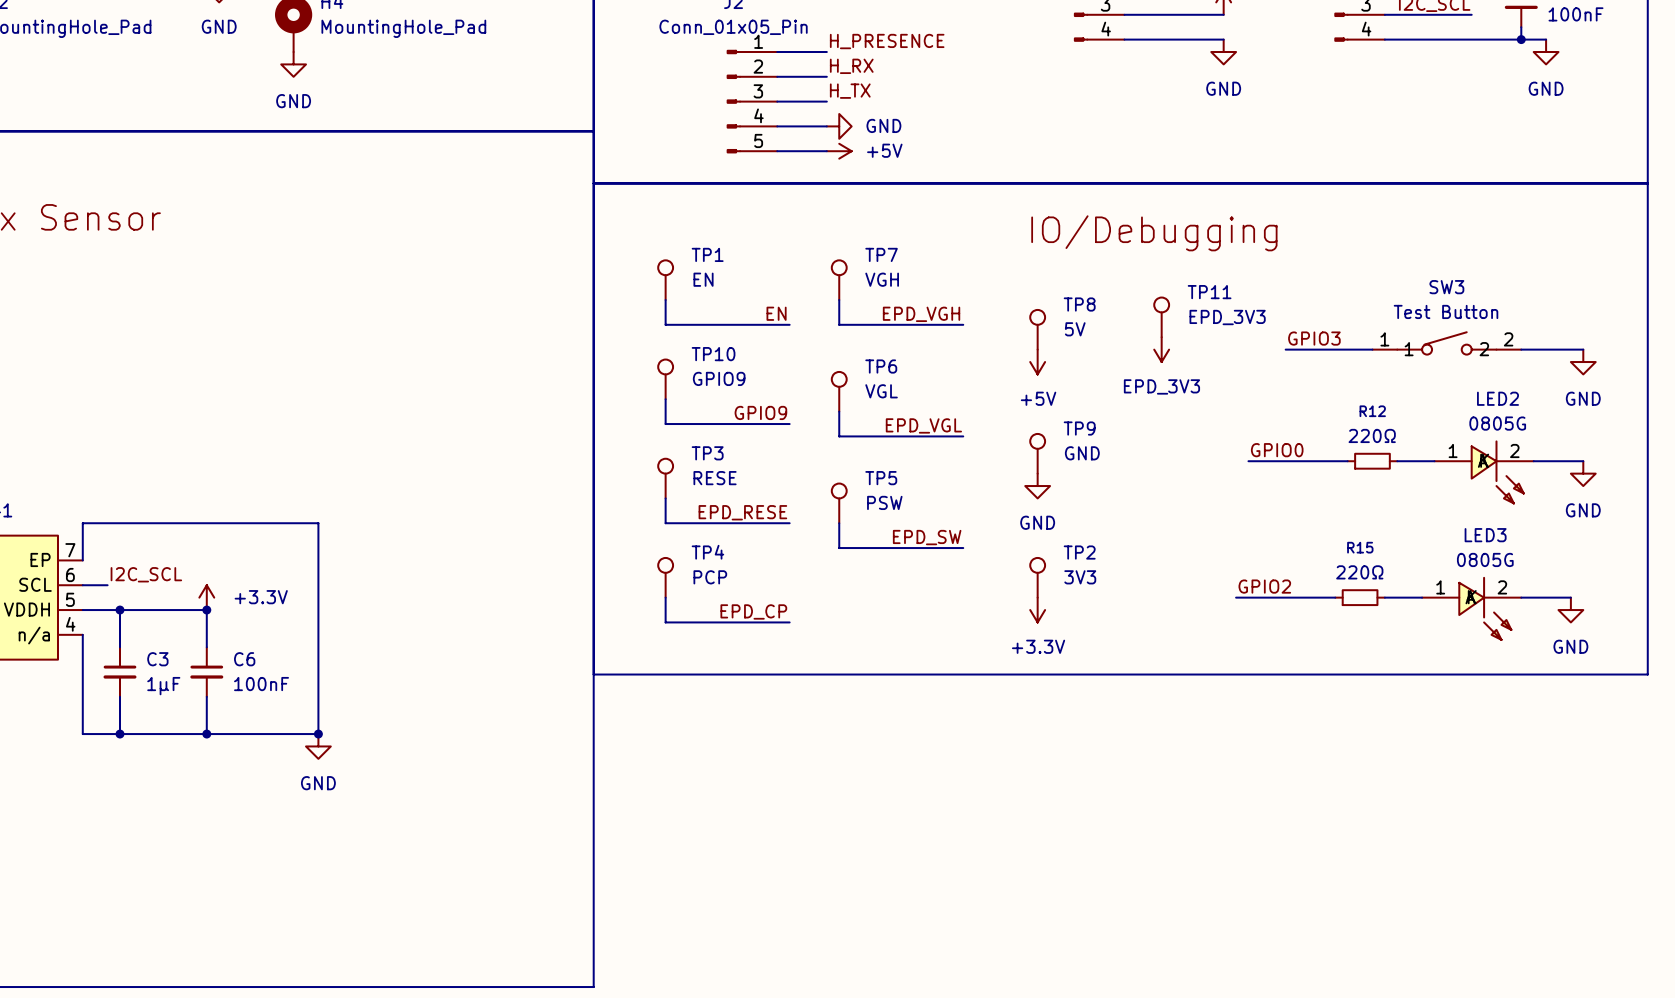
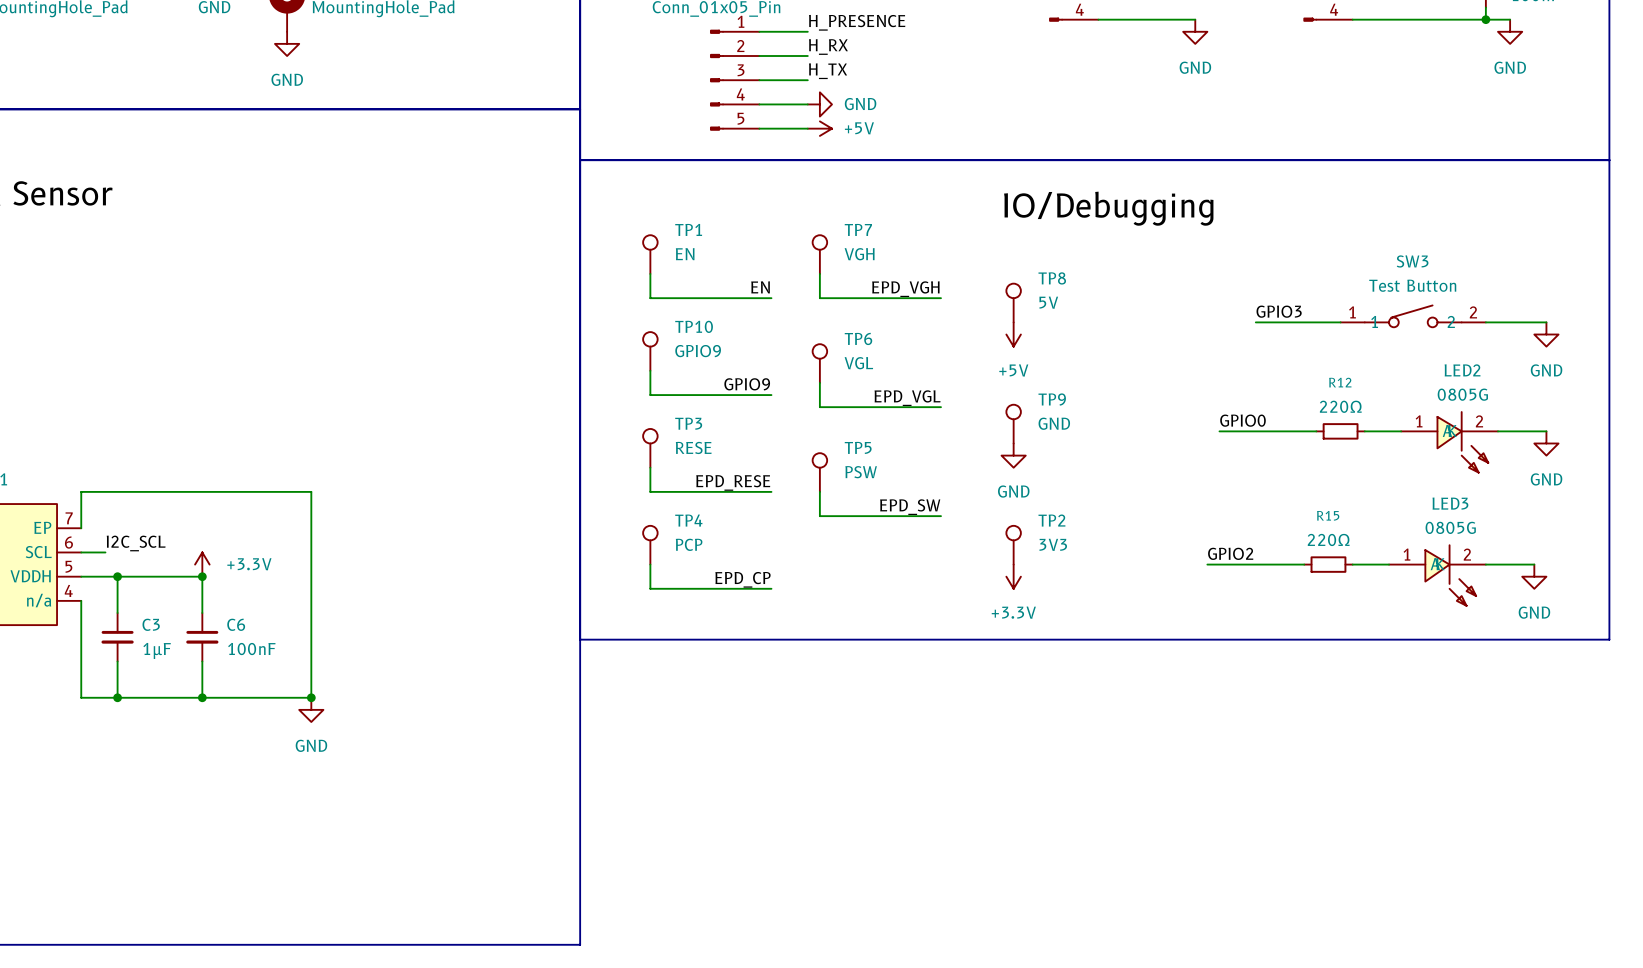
TP11: EPD_3V3 (1161, 317) -> none
power symbol: EPD_3V3 (1161, 349) -> none

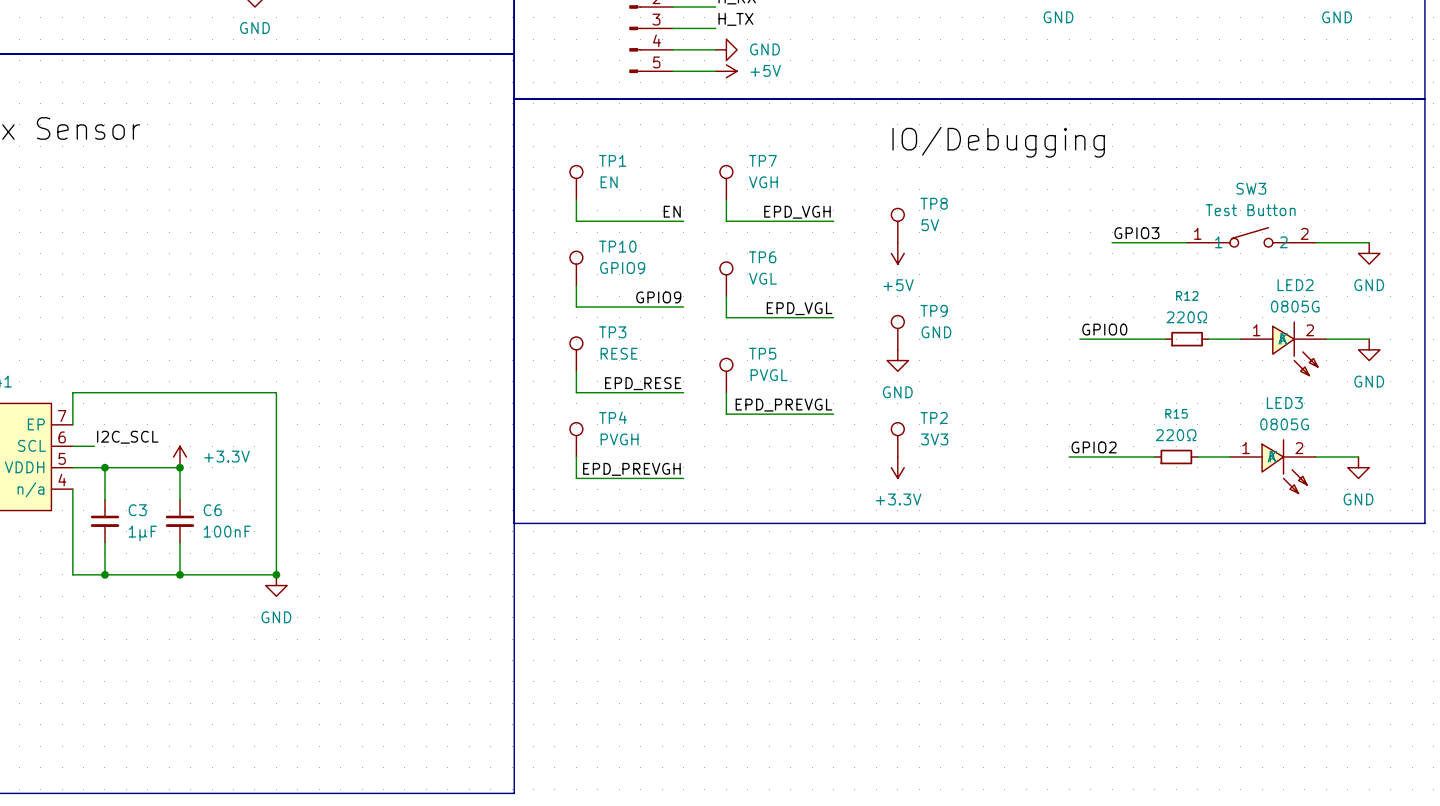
TP5 value: PSW (861, 472) -> PVGL (769, 375)
label: EPD_SW (910, 507) -> EPD_PREVGL (783, 405)
TP4 value: PCP (689, 544) -> PVGH (619, 439)
label: EPD_CP (742, 579) -> EPD_PREVGH (631, 469)

